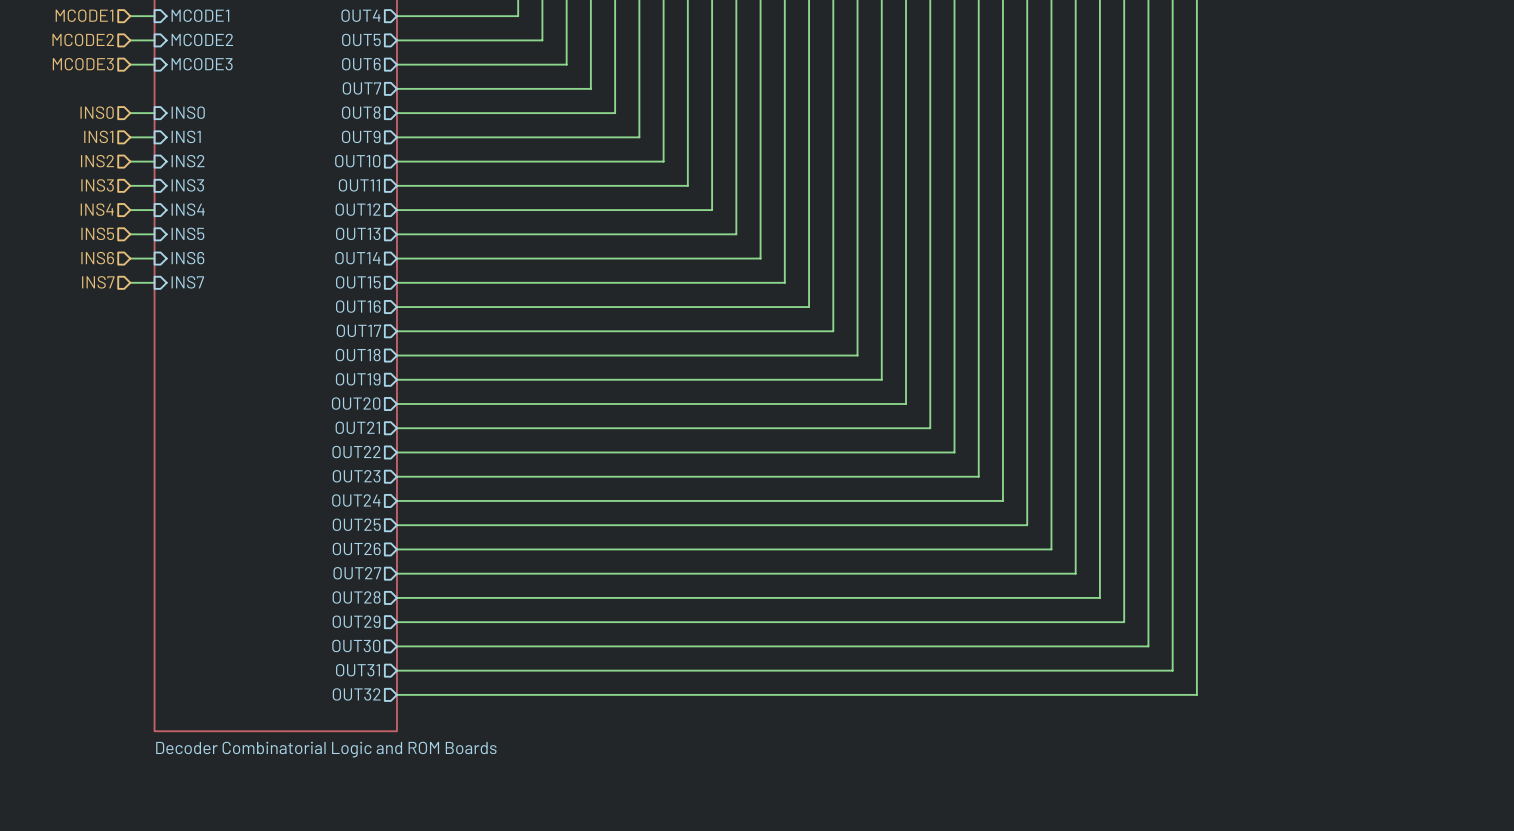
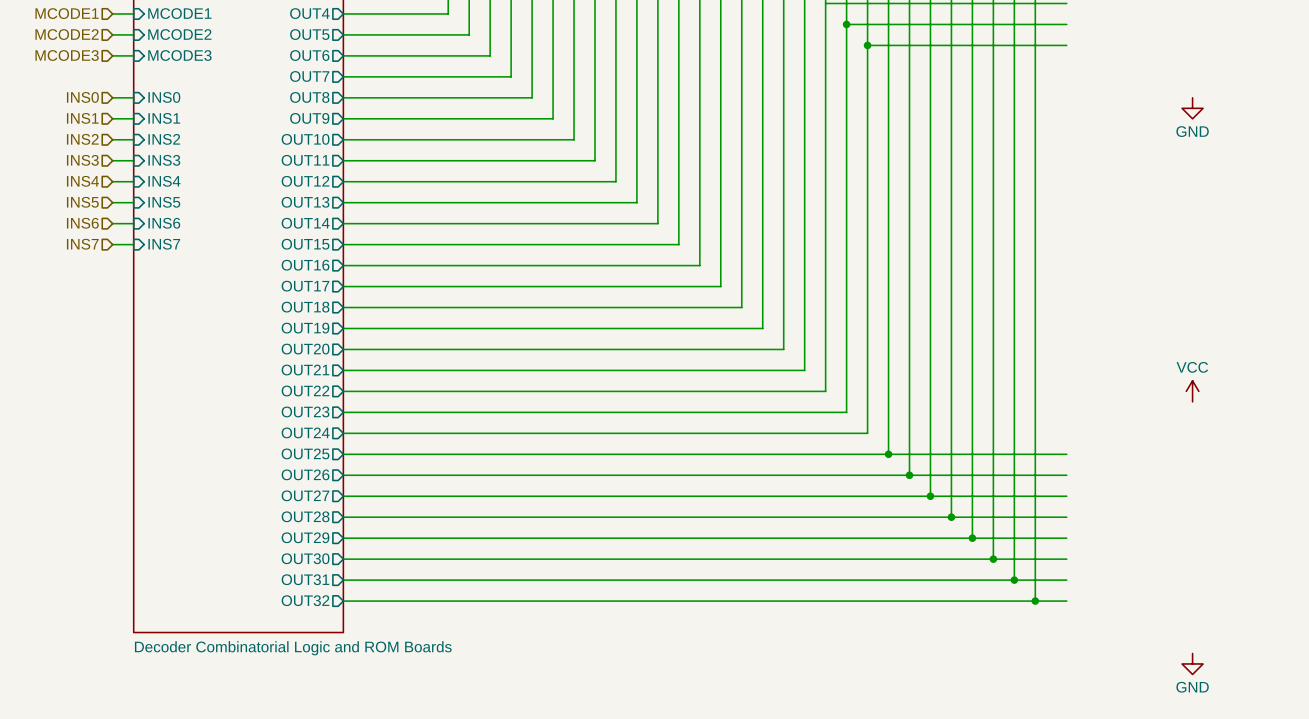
wire: none -> (825, 3) (1066, 3)
wire: none -> (846, 24) (1066, 24)
junction: none -> (846, 24)
wire: none -> (867, 45) (1066, 45)
junction: none -> (867, 45)
power symbol: none -> GND (1192, 108)
power symbol: none -> VCC (1192, 391)
wire: none -> (888, 454) (1066, 454)
junction: none -> (888, 454)
wire: none -> (909, 475) (1066, 475)
junction: none -> (909, 475)
wire: none -> (930, 496) (1066, 496)
junction: none -> (930, 496)
wire: none -> (951, 517) (1066, 517)
junction: none -> (951, 517)
wire: none -> (972, 538) (1066, 538)
junction: none -> (972, 538)
wire: none -> (993, 559) (1066, 559)
junction: none -> (993, 559)
wire: none -> (1014, 580) (1066, 580)
junction: none -> (1014, 580)
wire: none -> (1035, 601) (1066, 601)
junction: none -> (1035, 601)
power symbol: none -> GND (1192, 663)

